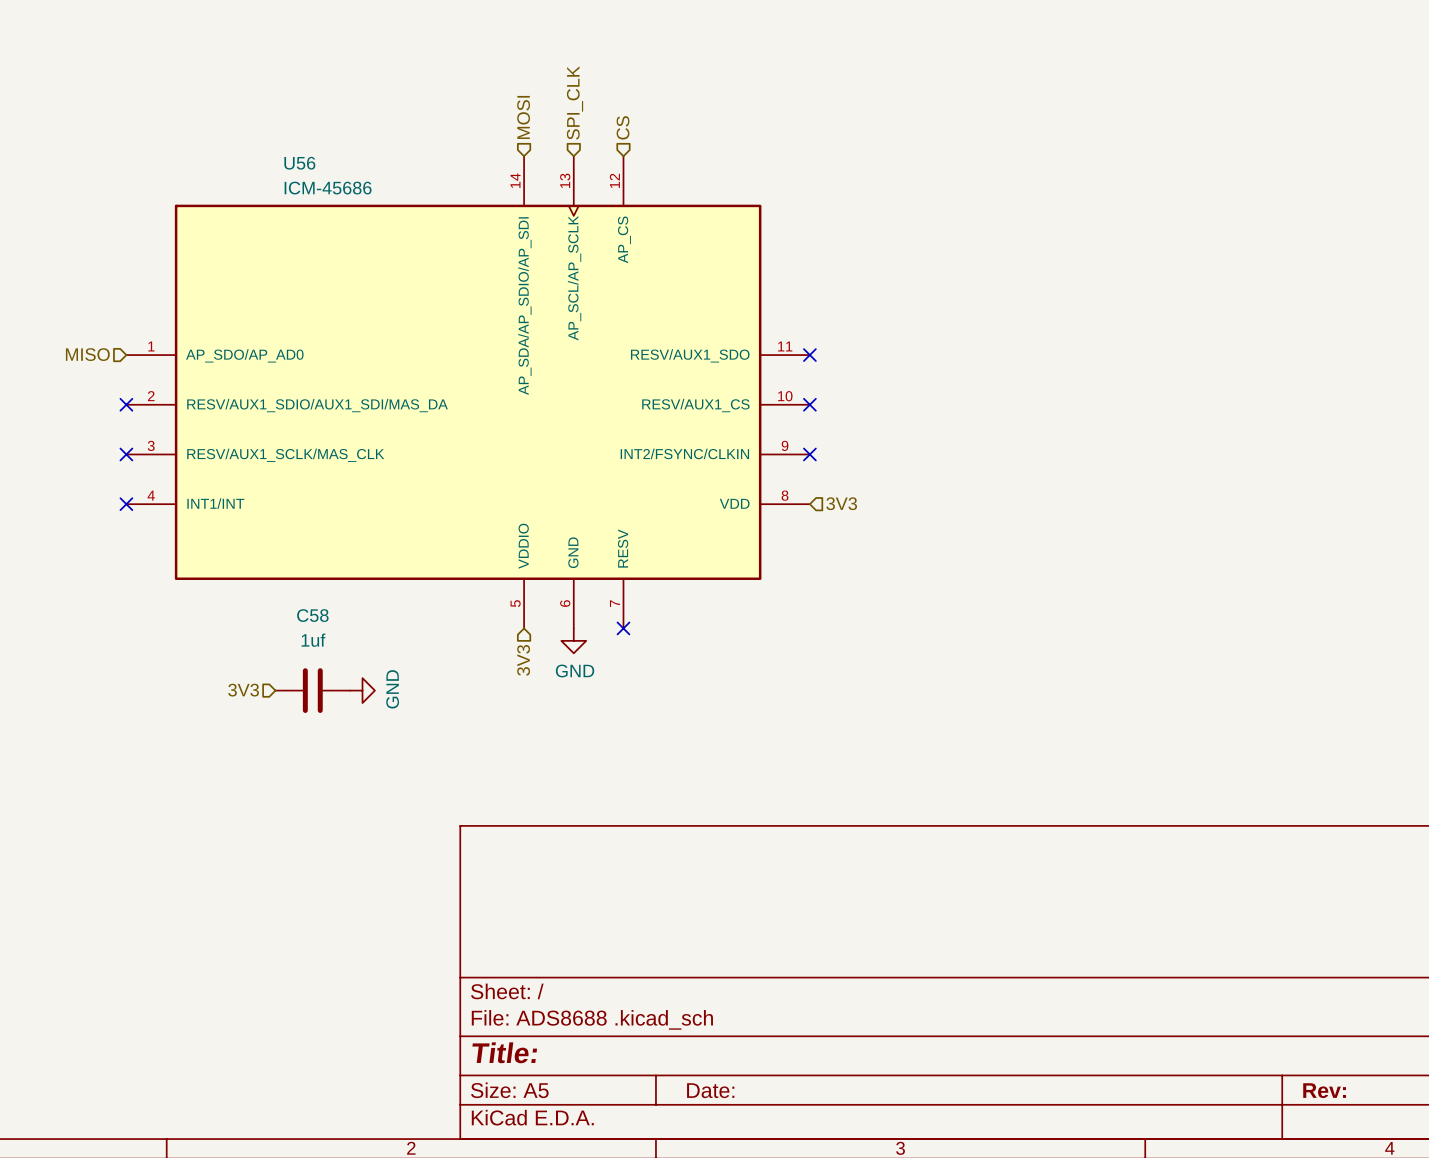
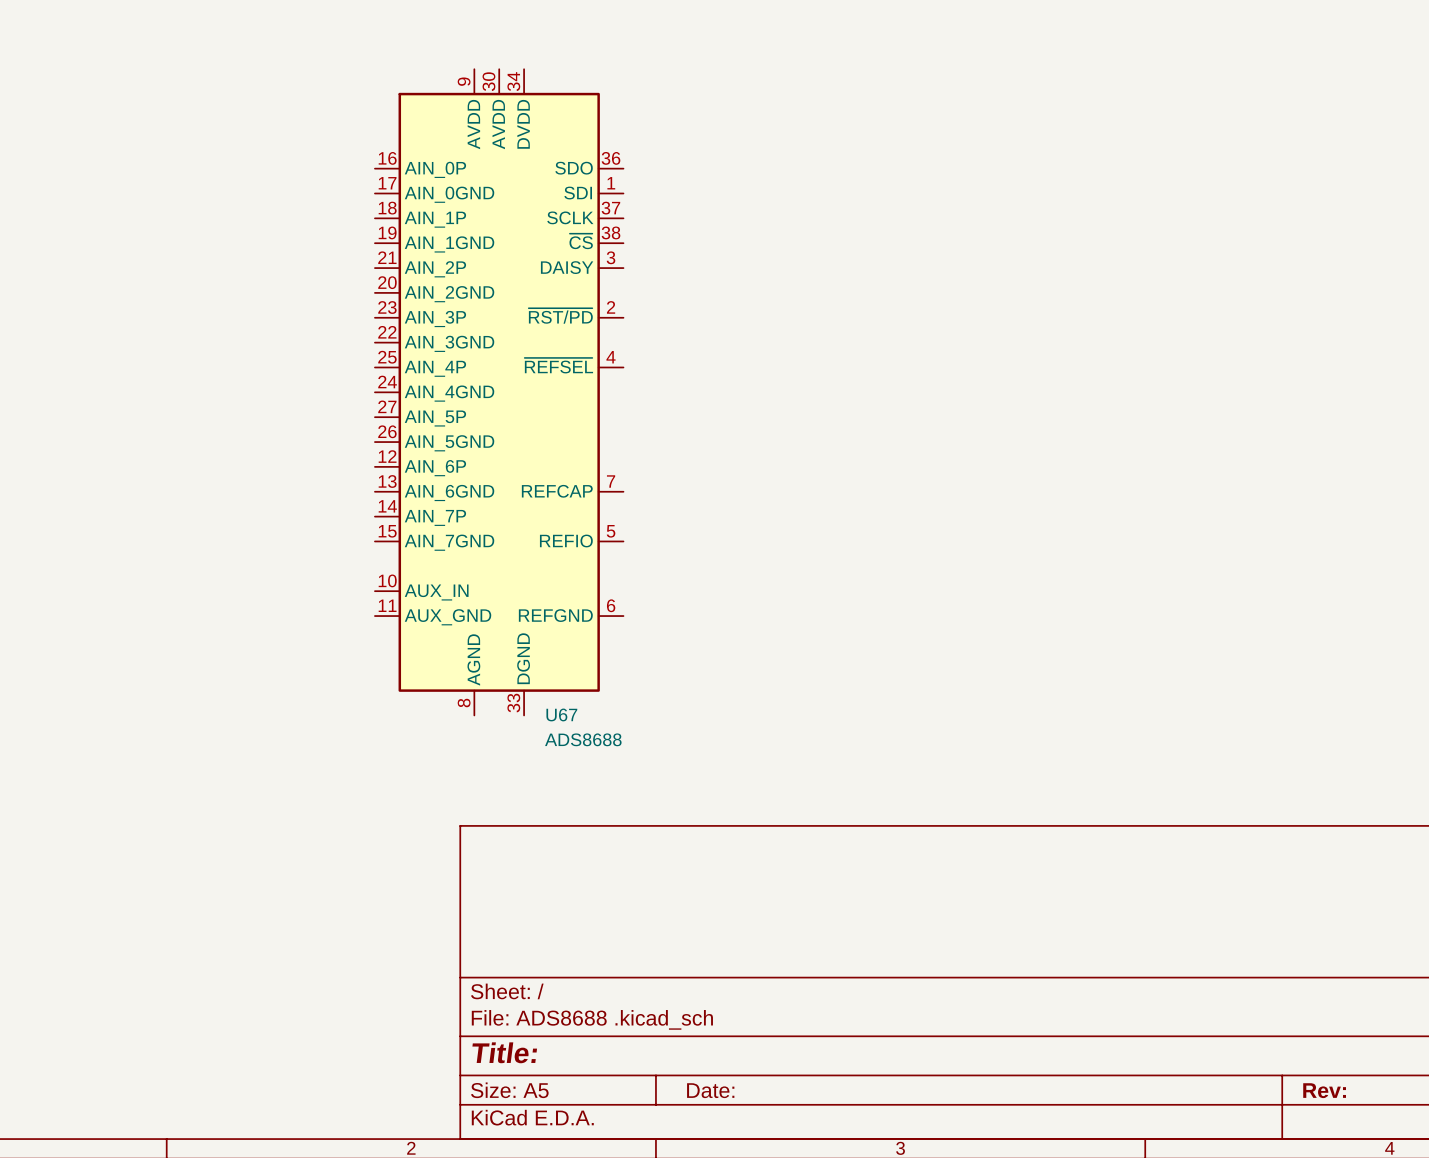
hierarchical label: SPI_CLK (575, 102) -> none
hierarchical label: MOSI (523, 117) -> none
hierarchical label: CS (623, 127) -> none
hierarchical label: MISO (87, 354) -> none
no-connect mark: (809, 355) -> none
U56: ICM-45686 (468, 392) -> none
U67: none -> ADS8688 (499, 392)
no-connect mark: (126, 404) -> none
no-connect mark: (809, 404) -> none
no-connect mark: (126, 454) -> none
no-connect mark: (809, 454) -> none
hierarchical label: 3V3 (841, 503) -> none
no-connect mark: (126, 504) -> none
no-connect mark: (623, 628) -> none
power symbol: GND (573, 640) -> none
hierarchical label: 3V3 (523, 660) -> none
hierarchical label: 3V3 (243, 690) -> none
C58: 1uf (312, 690) -> none
power symbol: GND (362, 690) -> none

